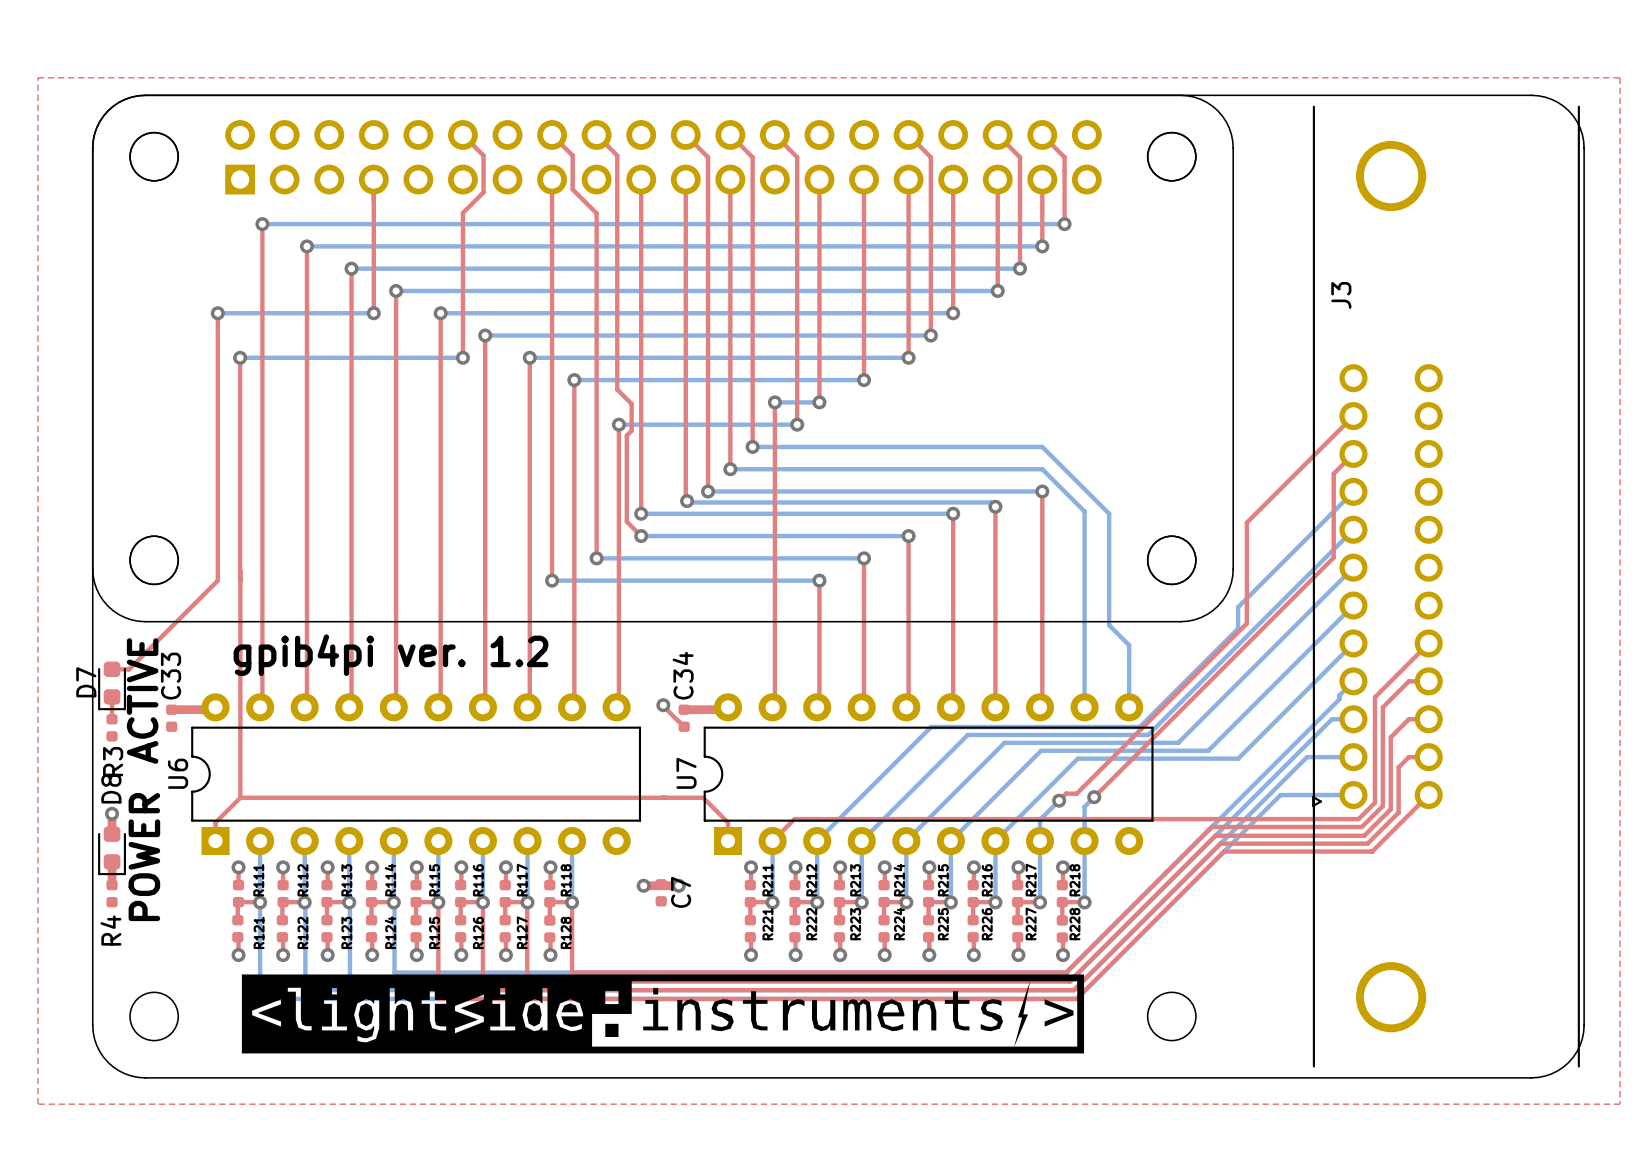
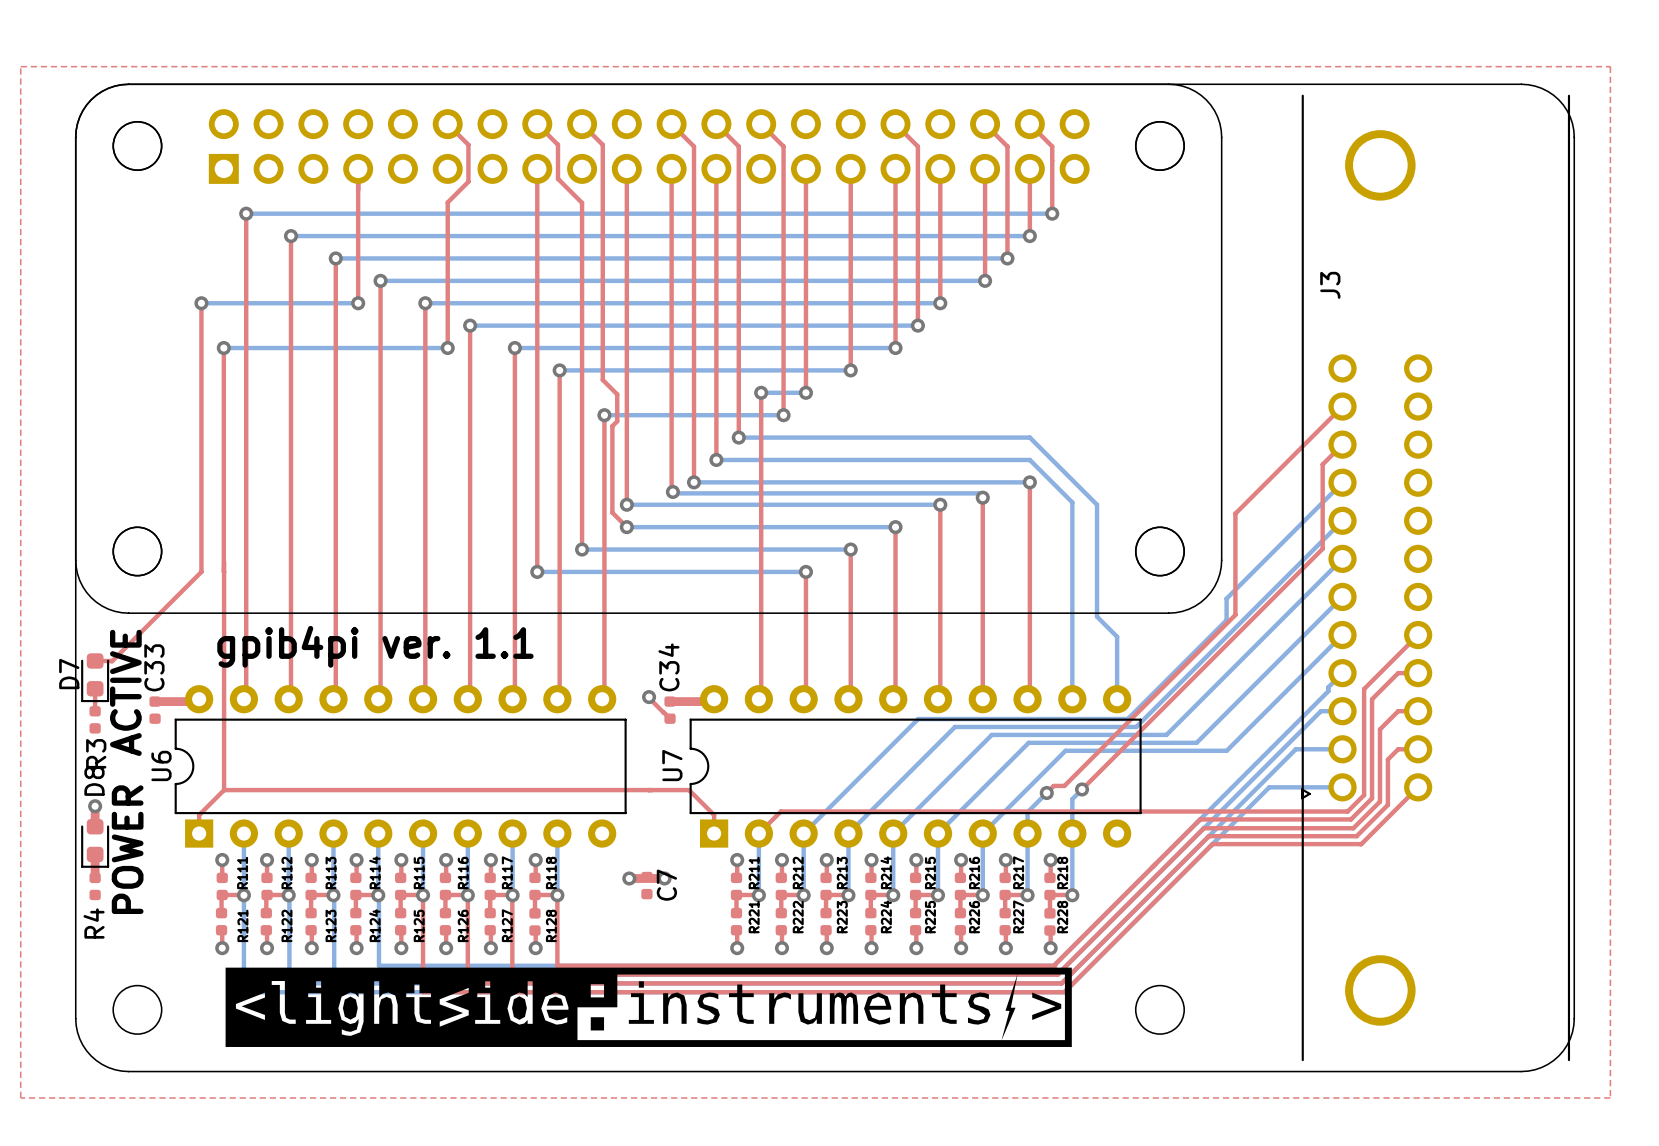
text: gpib4pi ver. 1.2 (391, 655) -> gpib4pi ver. 1.1 (375, 646)

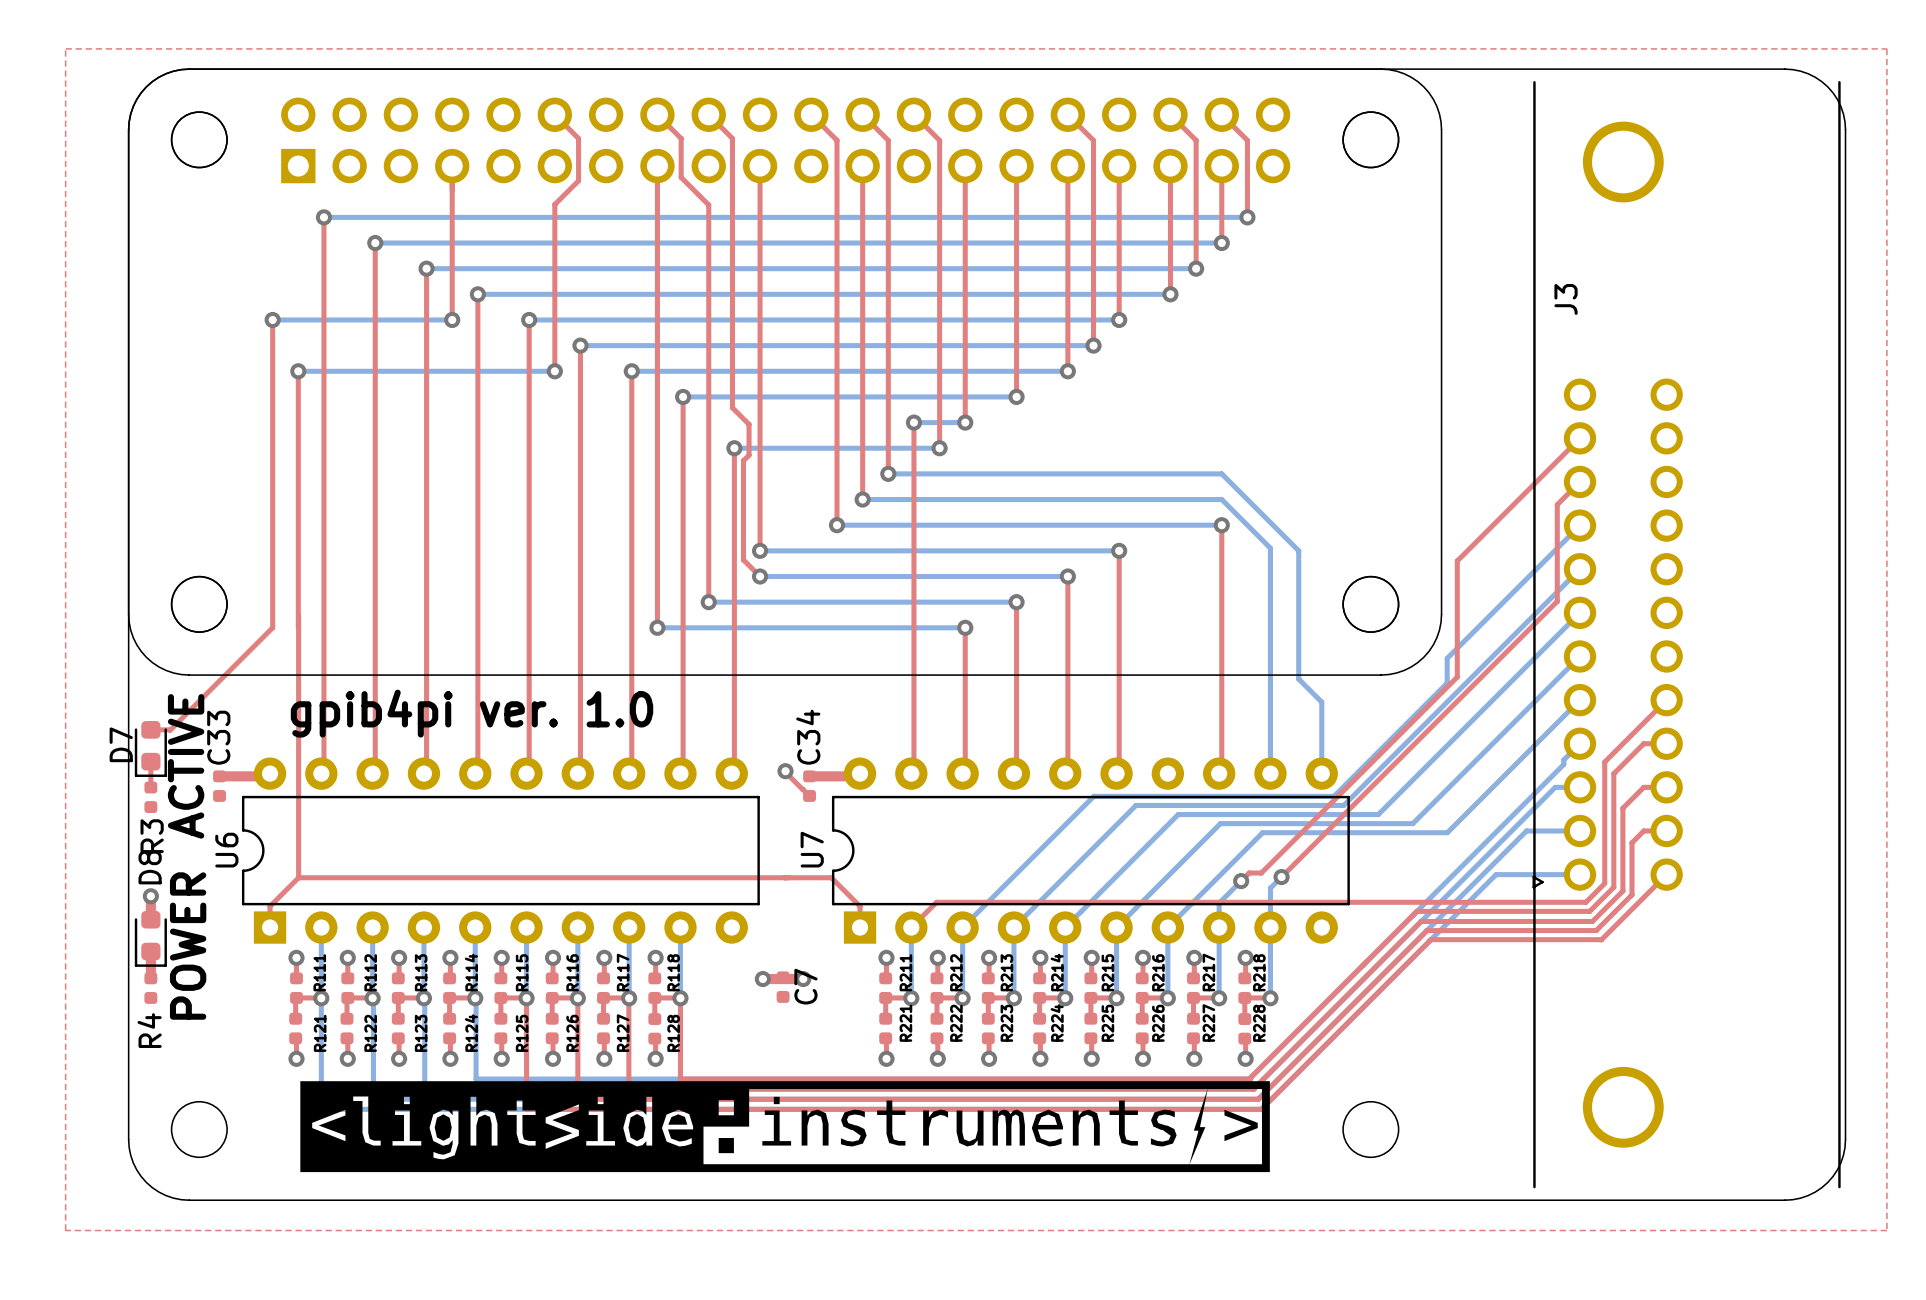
top track: (671, 168) (671, 491) -> none
via: (672, 491) -> none
bottom track: (674, 493) (978, 493) (982, 497) -> none
top track: (982, 497) (982, 699) -> none
via: (982, 497) -> none
text: gpib4pi ver. 1.1 (375, 646) -> gpib4pi ver. 1.0 (472, 713)

